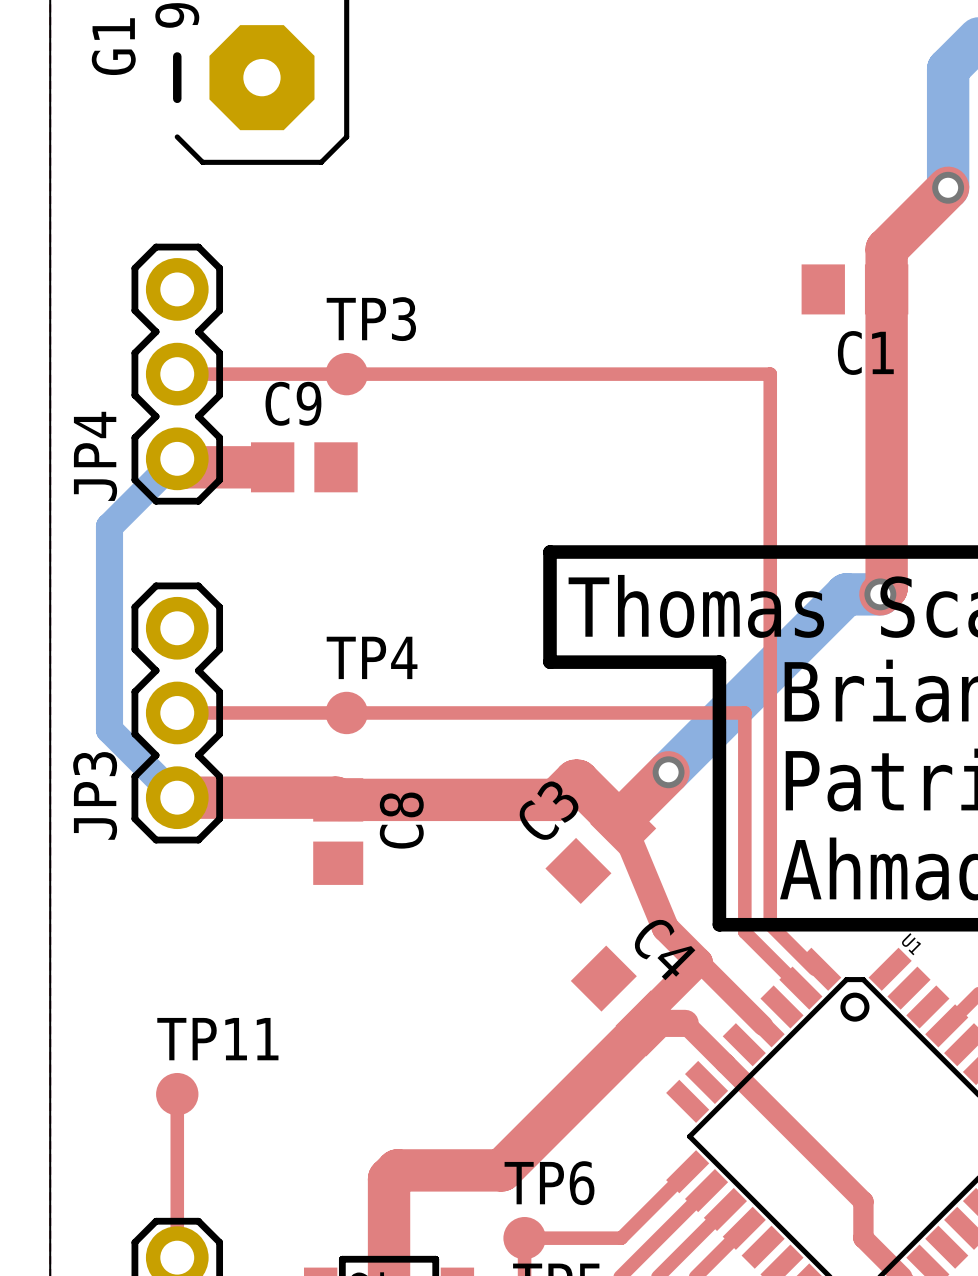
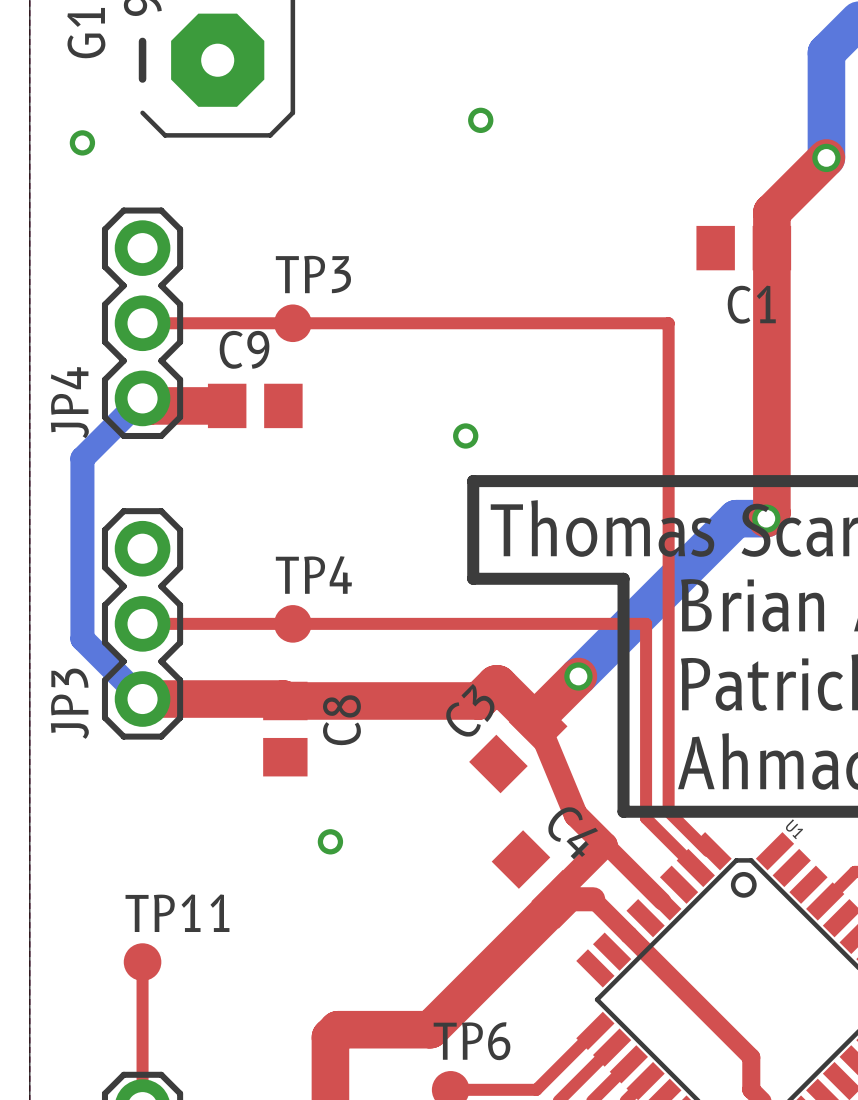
via: none -> (480, 120)
via: none -> (82, 142)
via: none -> (465, 435)
via: none -> (330, 841)

